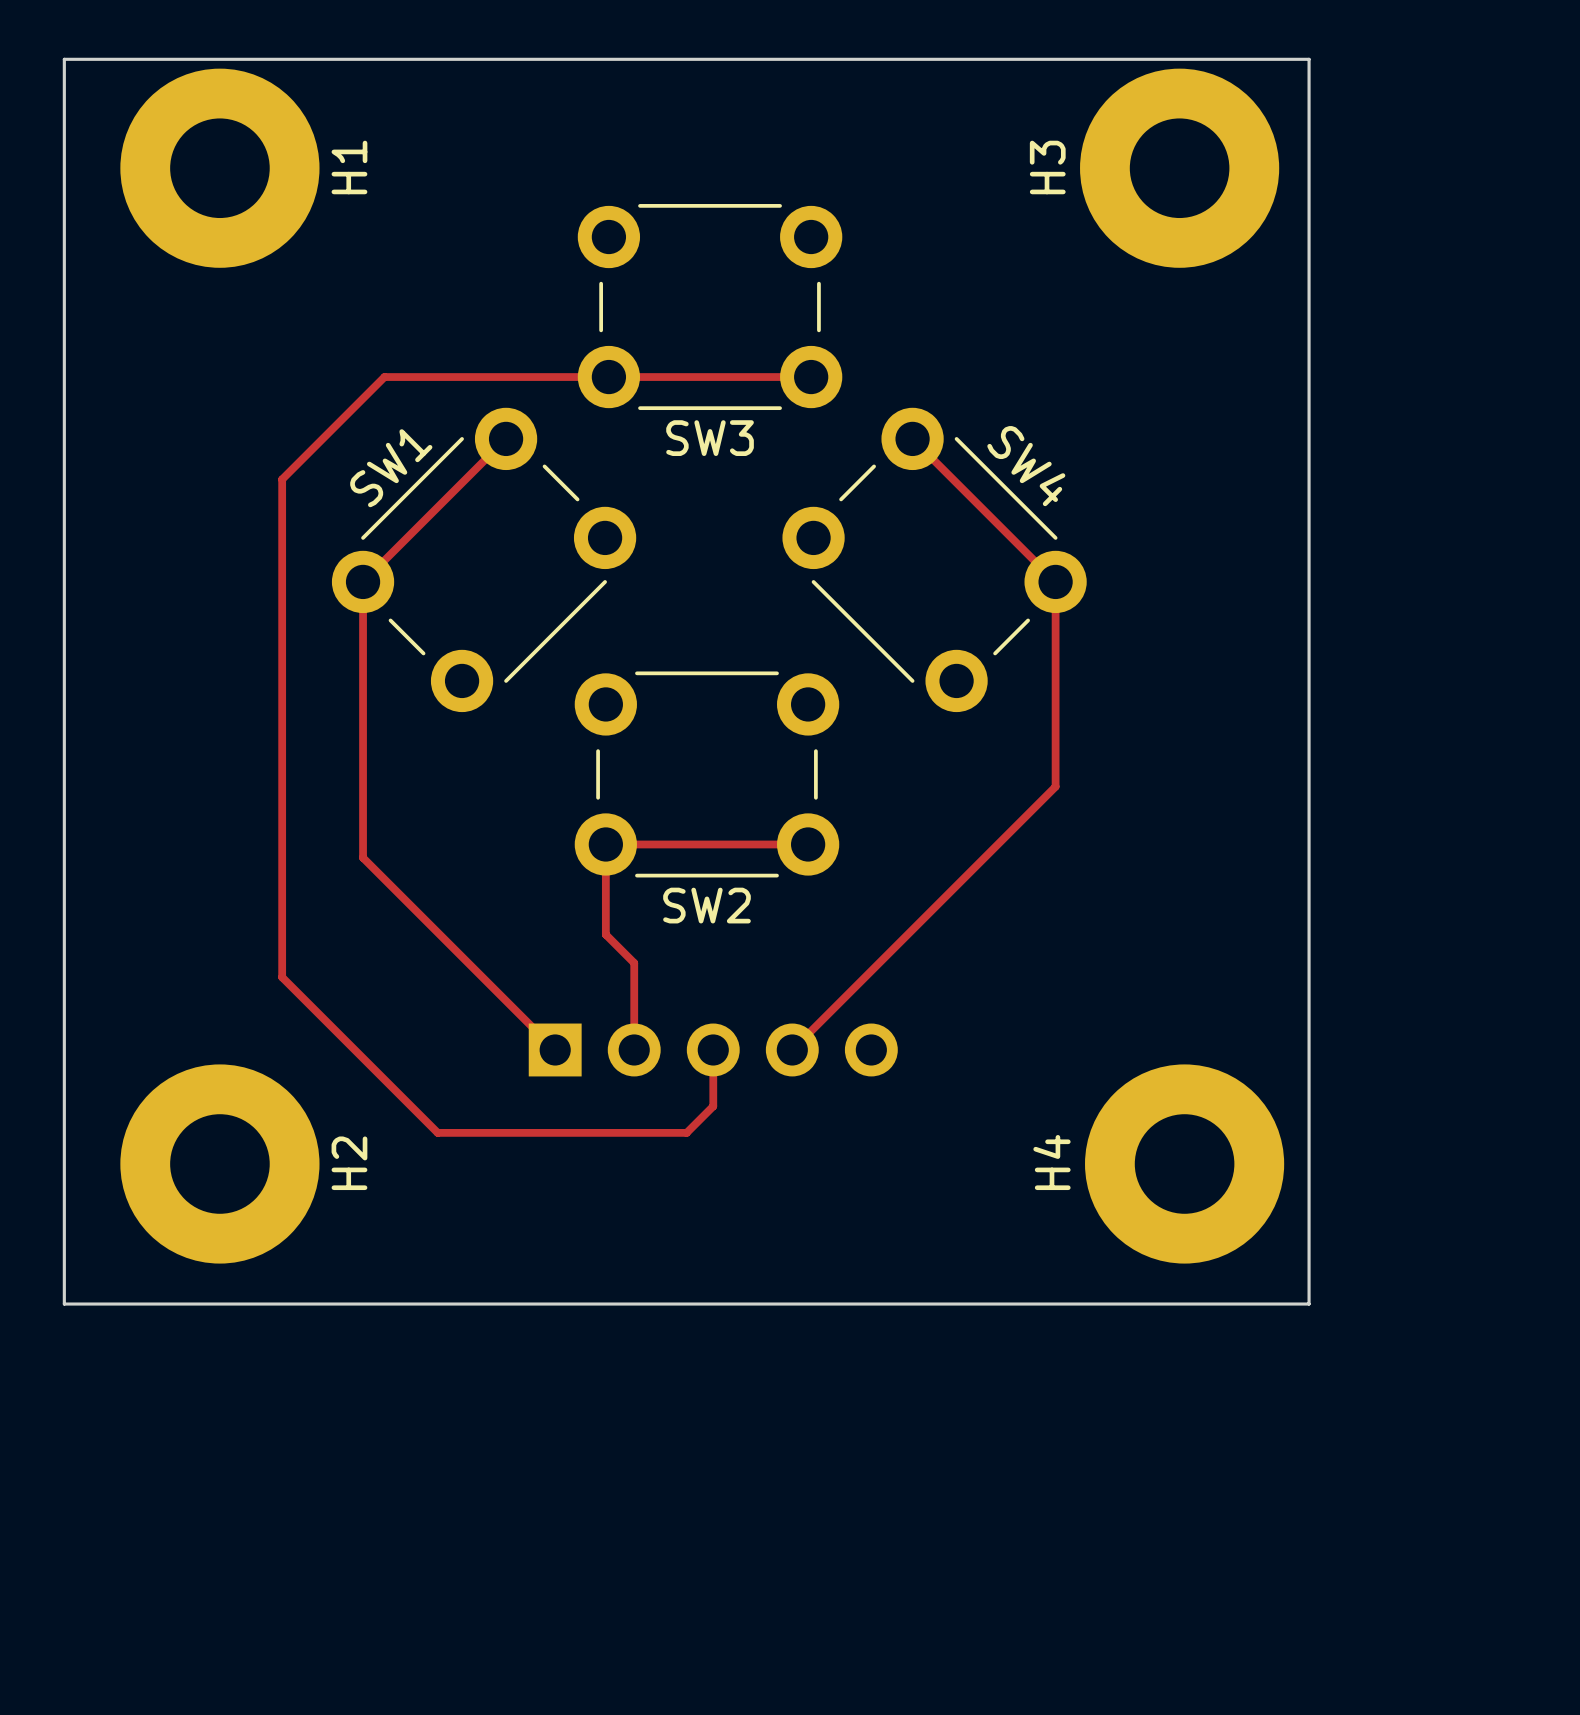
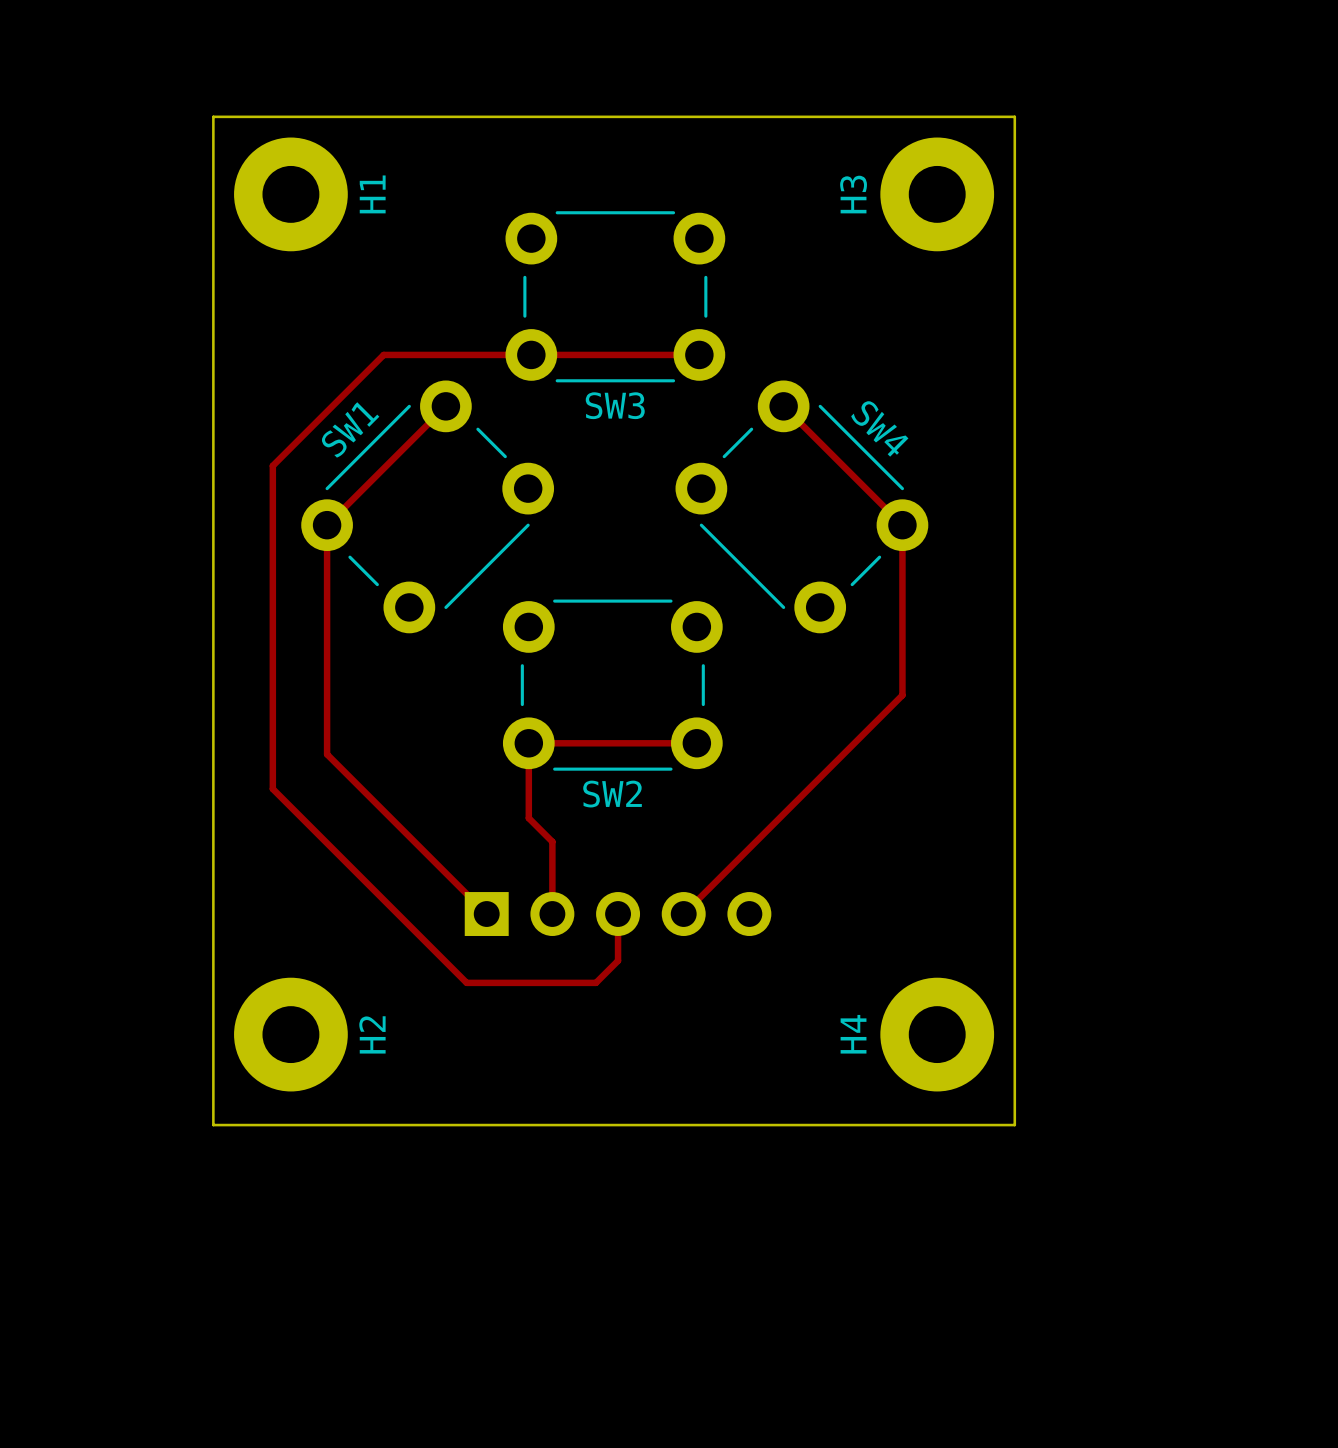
H1 footprint: [120, 68, 320, 268] -> [234, 137, 348, 252]
H3 footprint: [1080, 68, 1280, 268] -> [880, 137, 995, 252]
top track: (431, 377) (384, 377) (282, 479) (282, 977) (437, 1132) (531, 1132) -> (383, 354) (272, 465) (272, 788) (466, 982)
H2 footprint: [120, 1064, 320, 1264] -> [234, 977, 348, 1092]
H4 footprint: [1085, 1064, 1285, 1264] -> [880, 977, 995, 1092]
board edge: (226, 1304) (64, 1304) (64, 59) (1309, 59) (1309, 1304) (1190, 1304) -> (213, 1125) (213, 116) (1014, 116) (1014, 1125)

